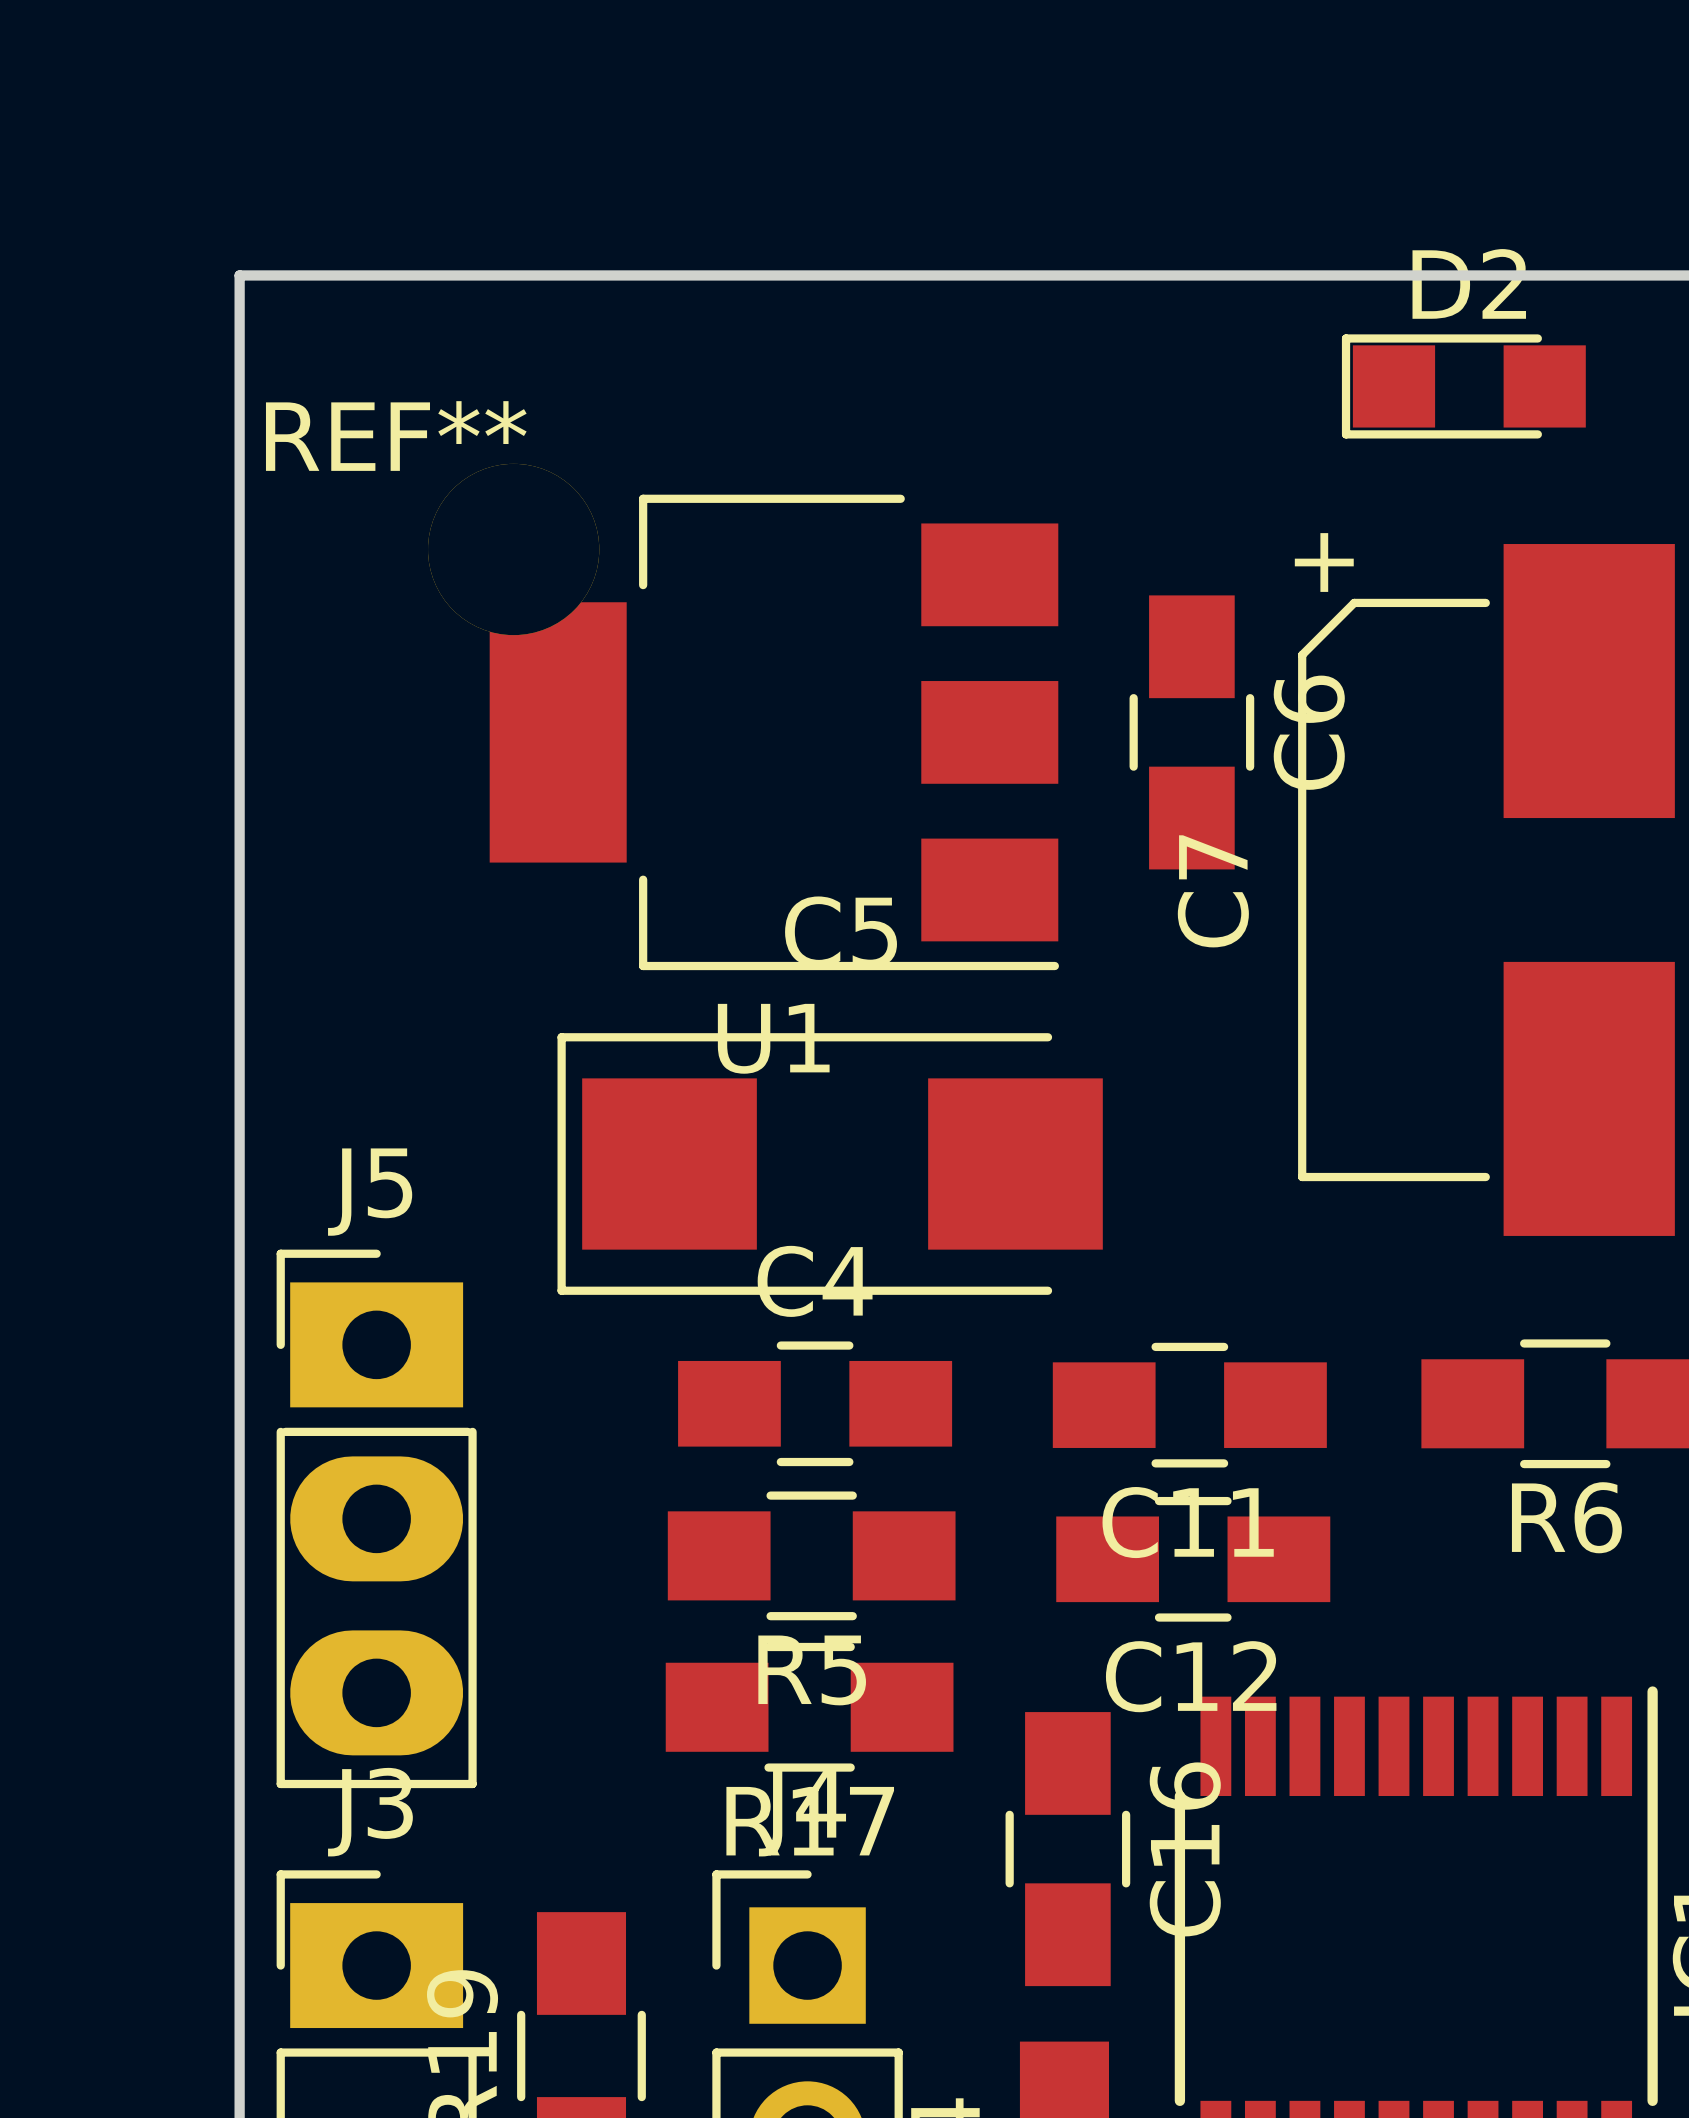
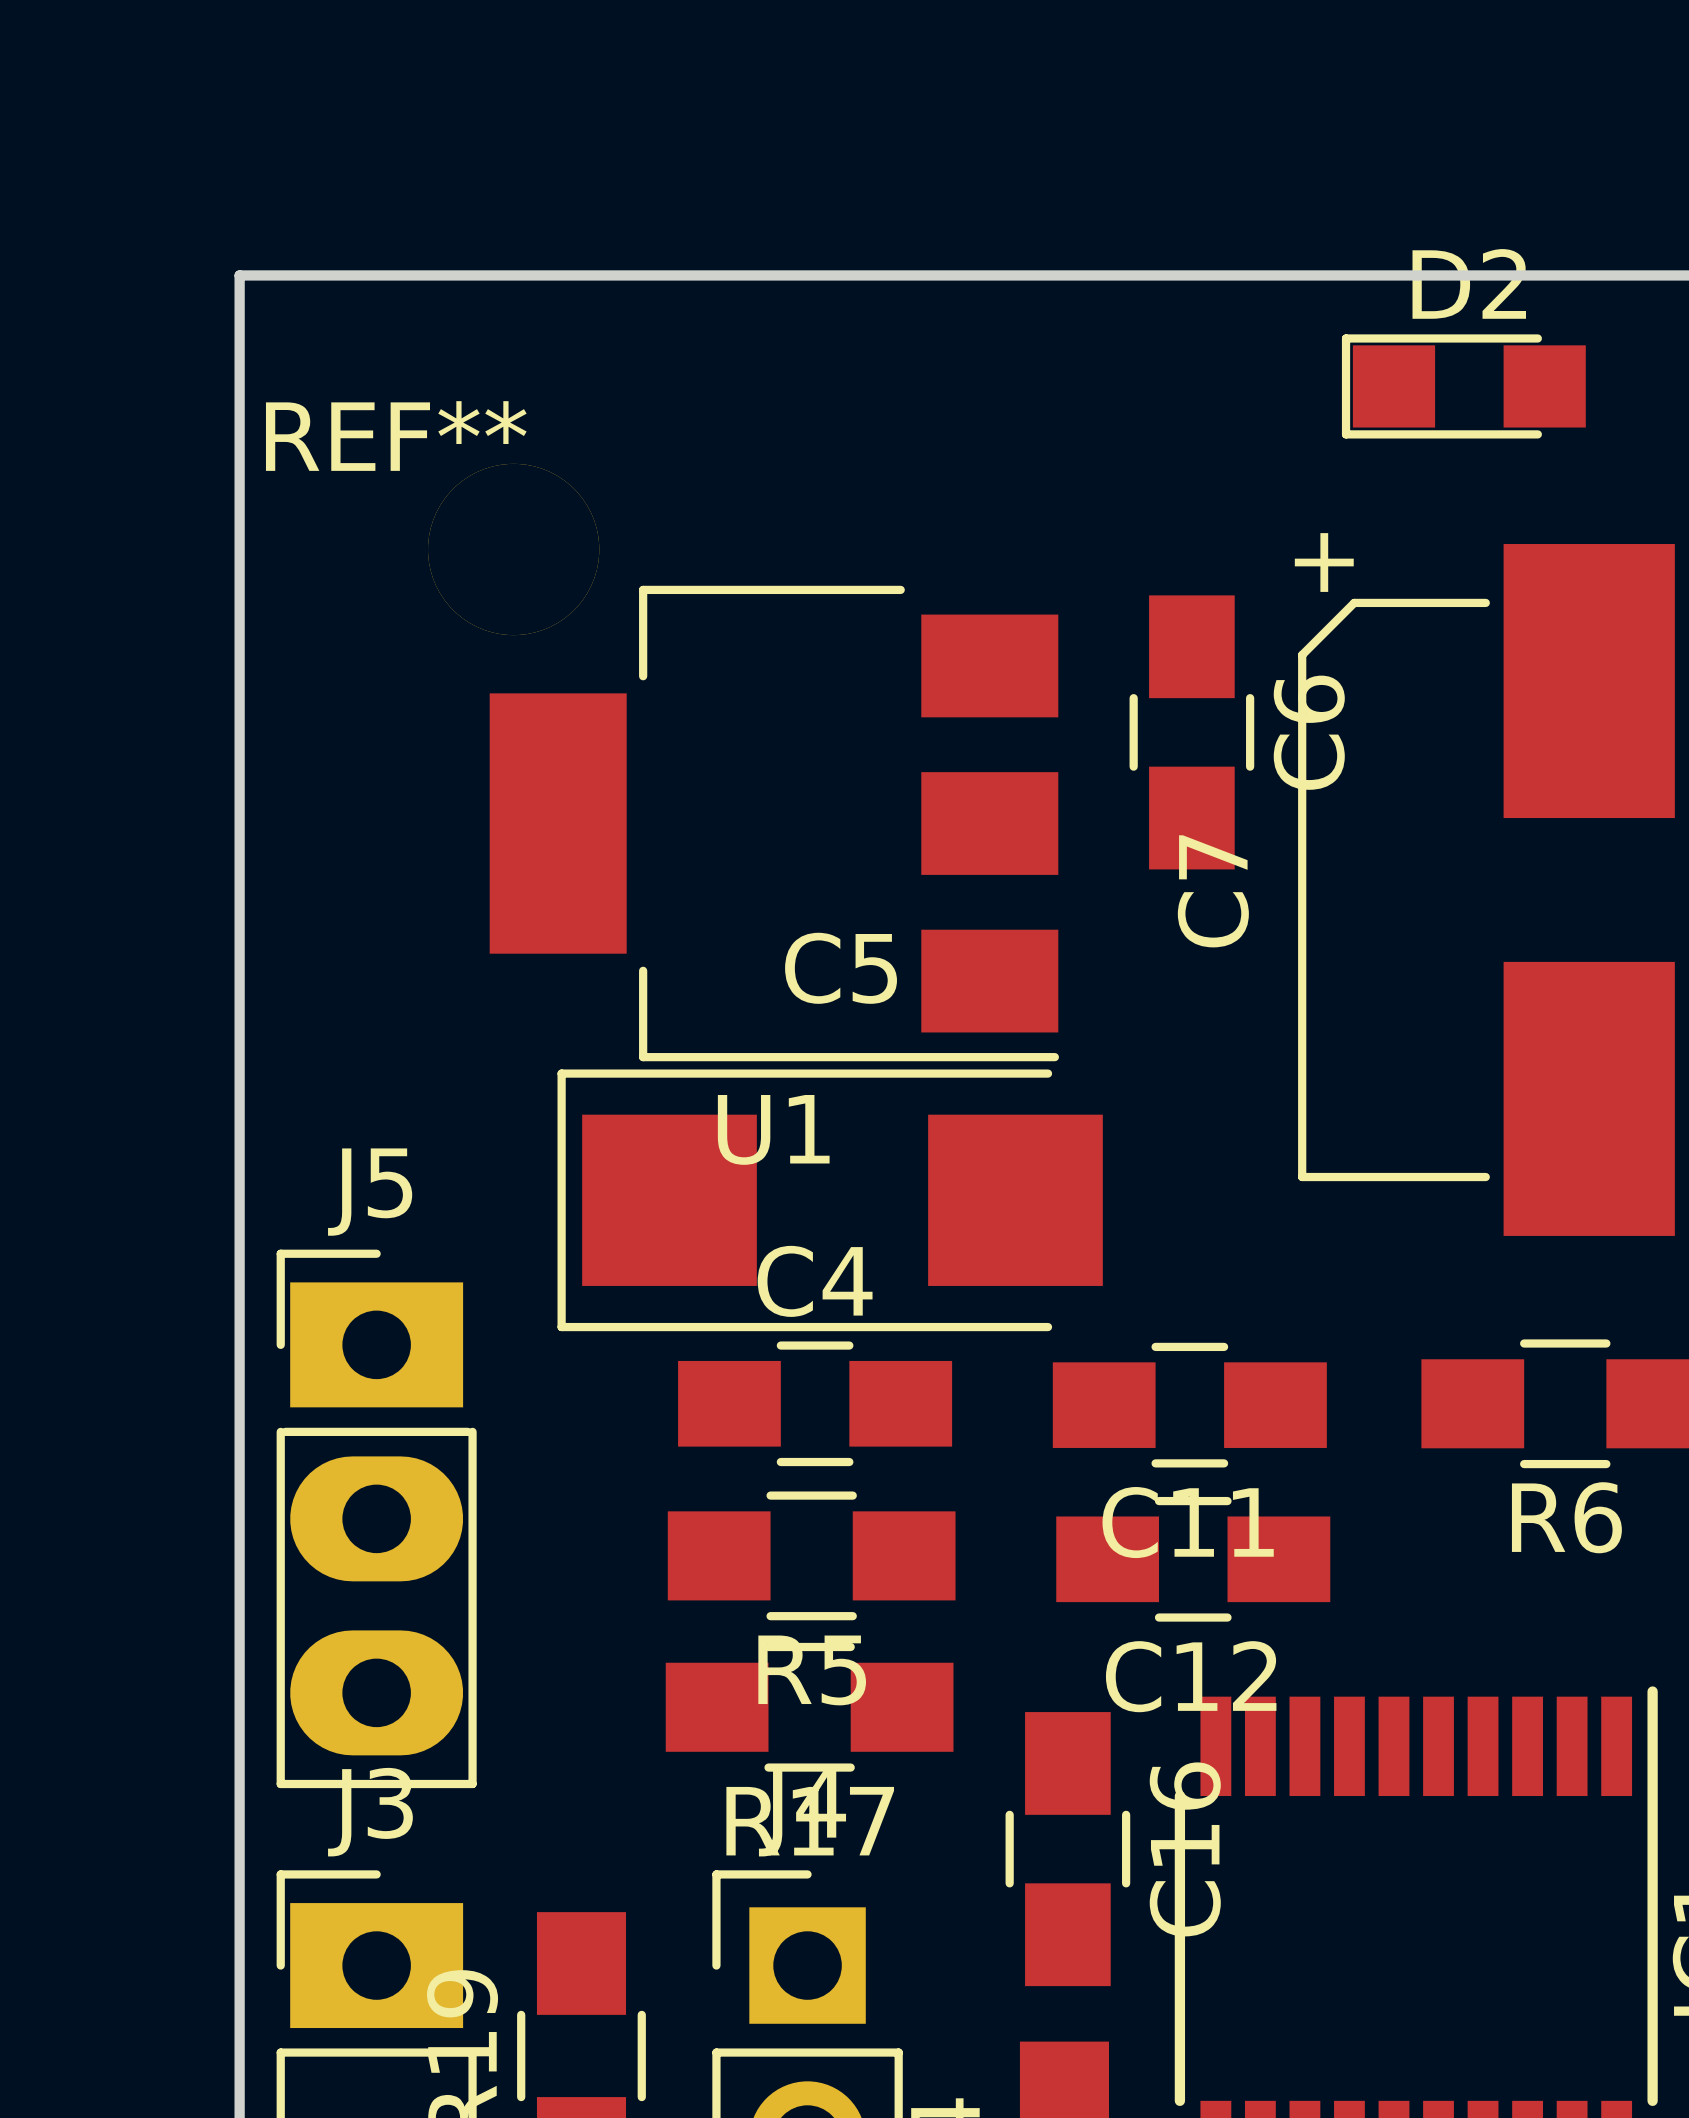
U1 position: (774, 732) -> (774, 823)
C5 position: (830, 1164) -> (830, 1200)

